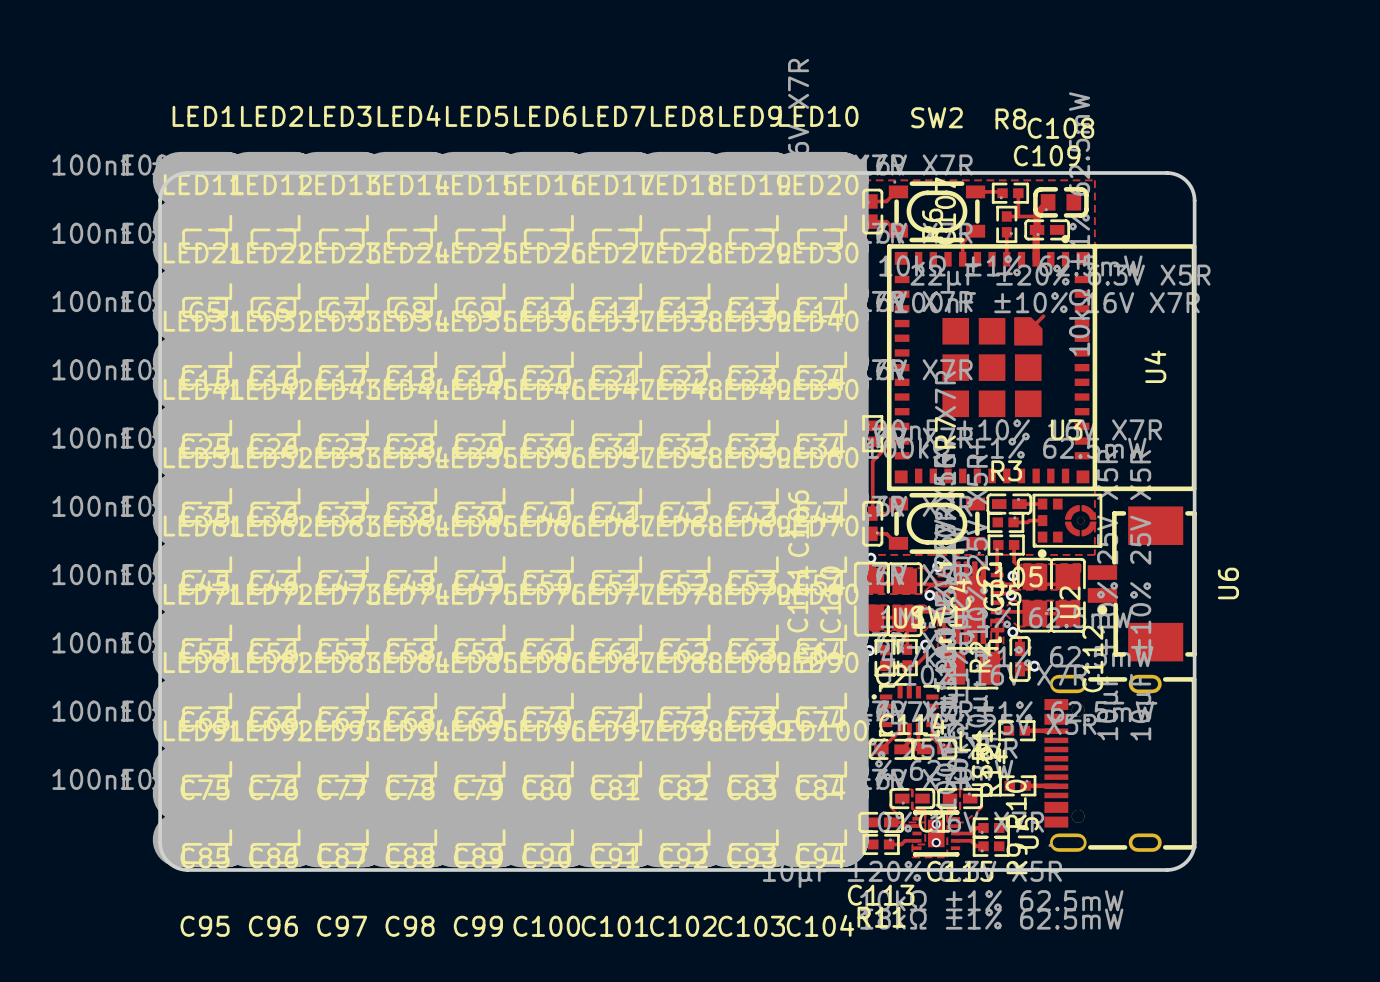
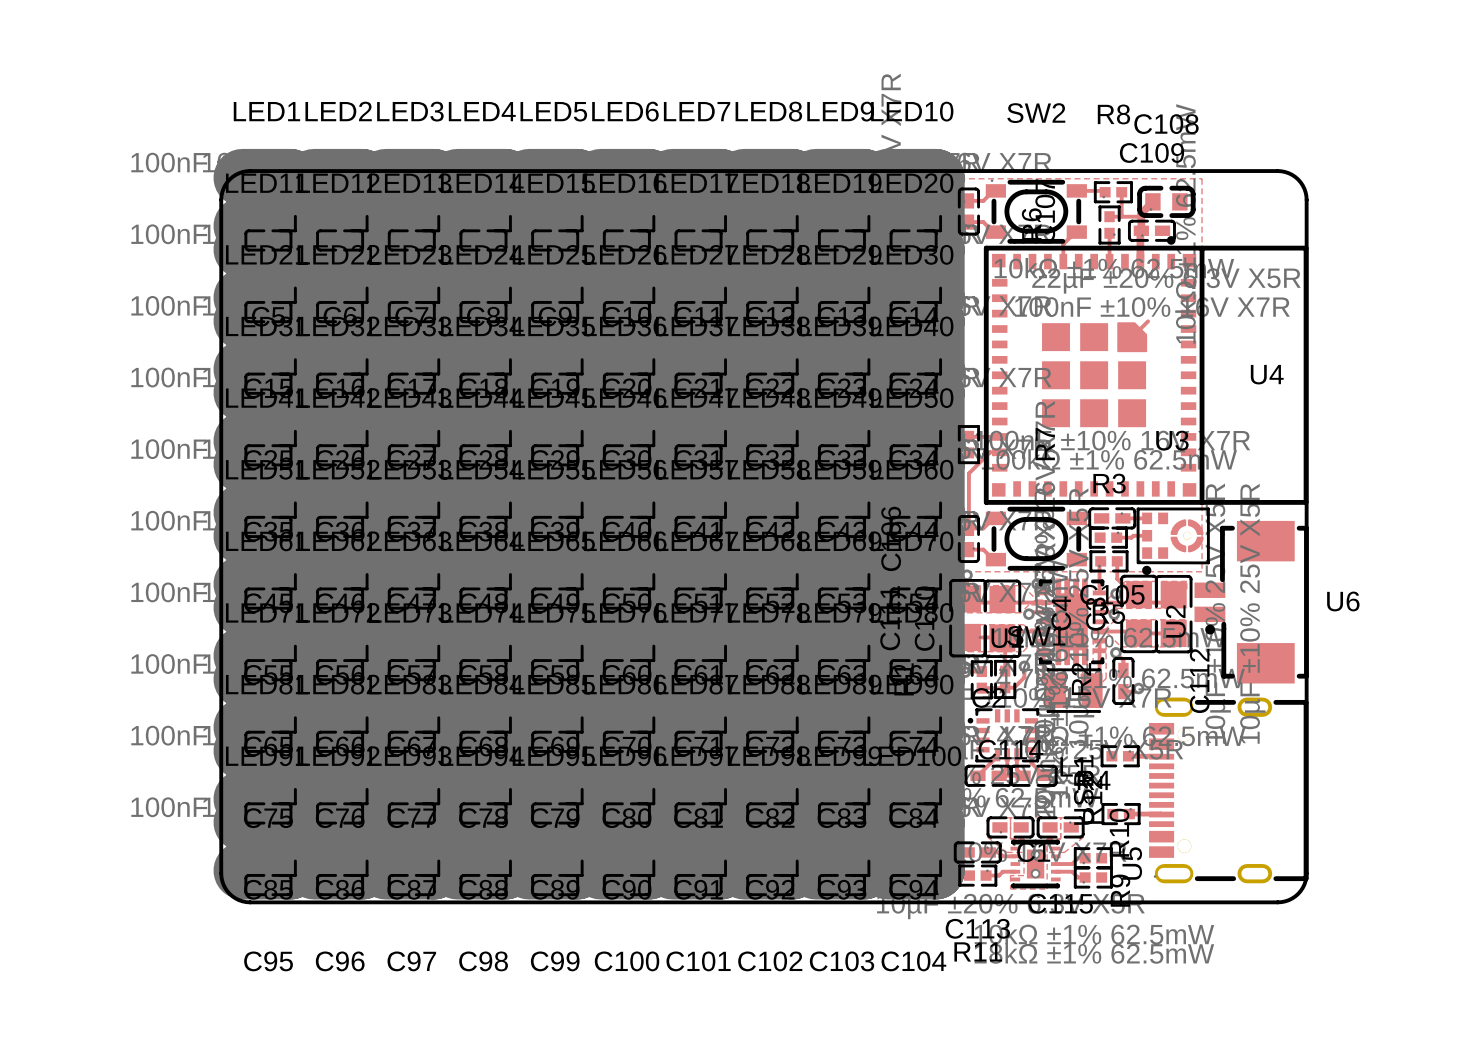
U4 name rotation: 0° (1155, 366) -> 90° clockwise (1267, 374)
U6 name rotation: 0° (1228, 583) -> 90° clockwise (1343, 601)

